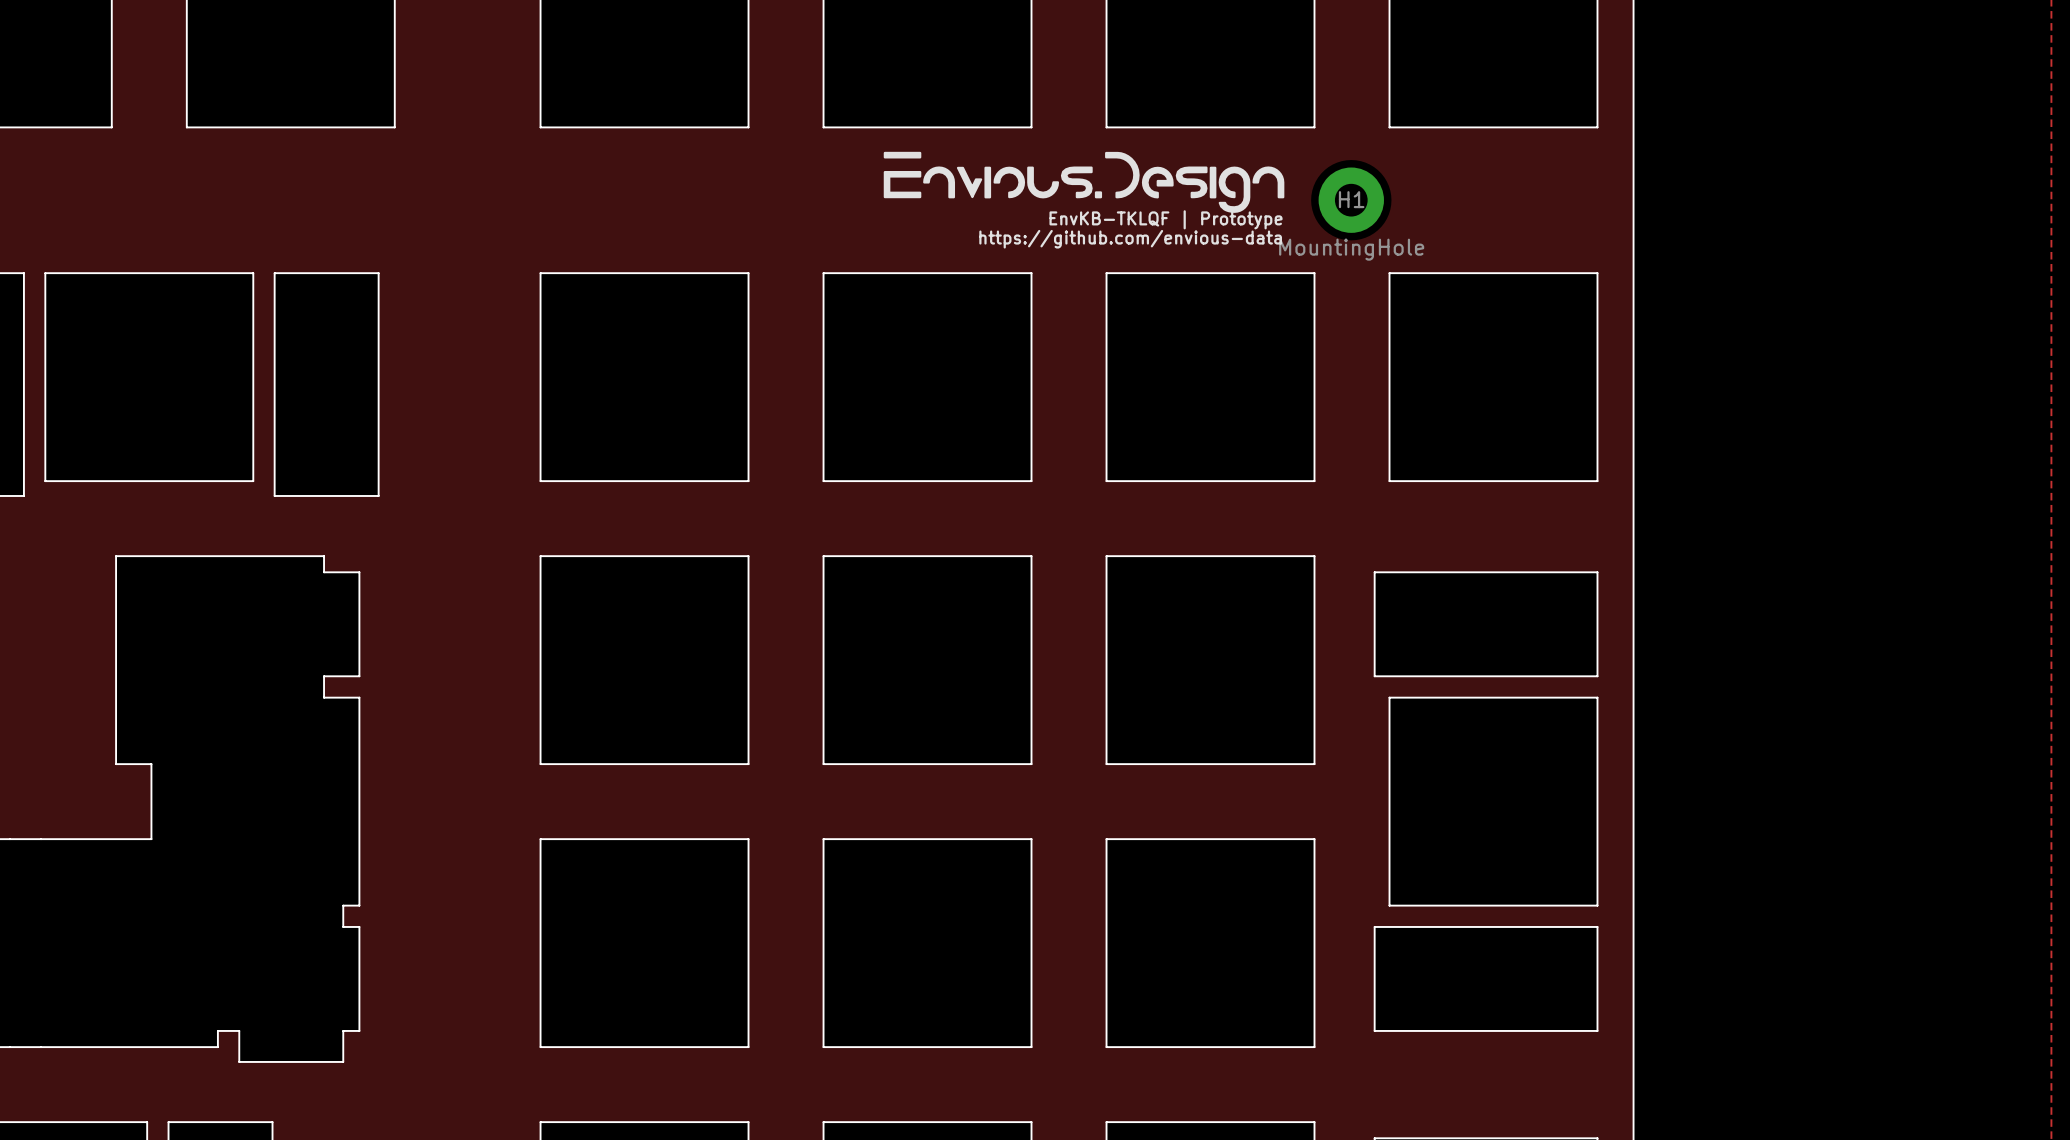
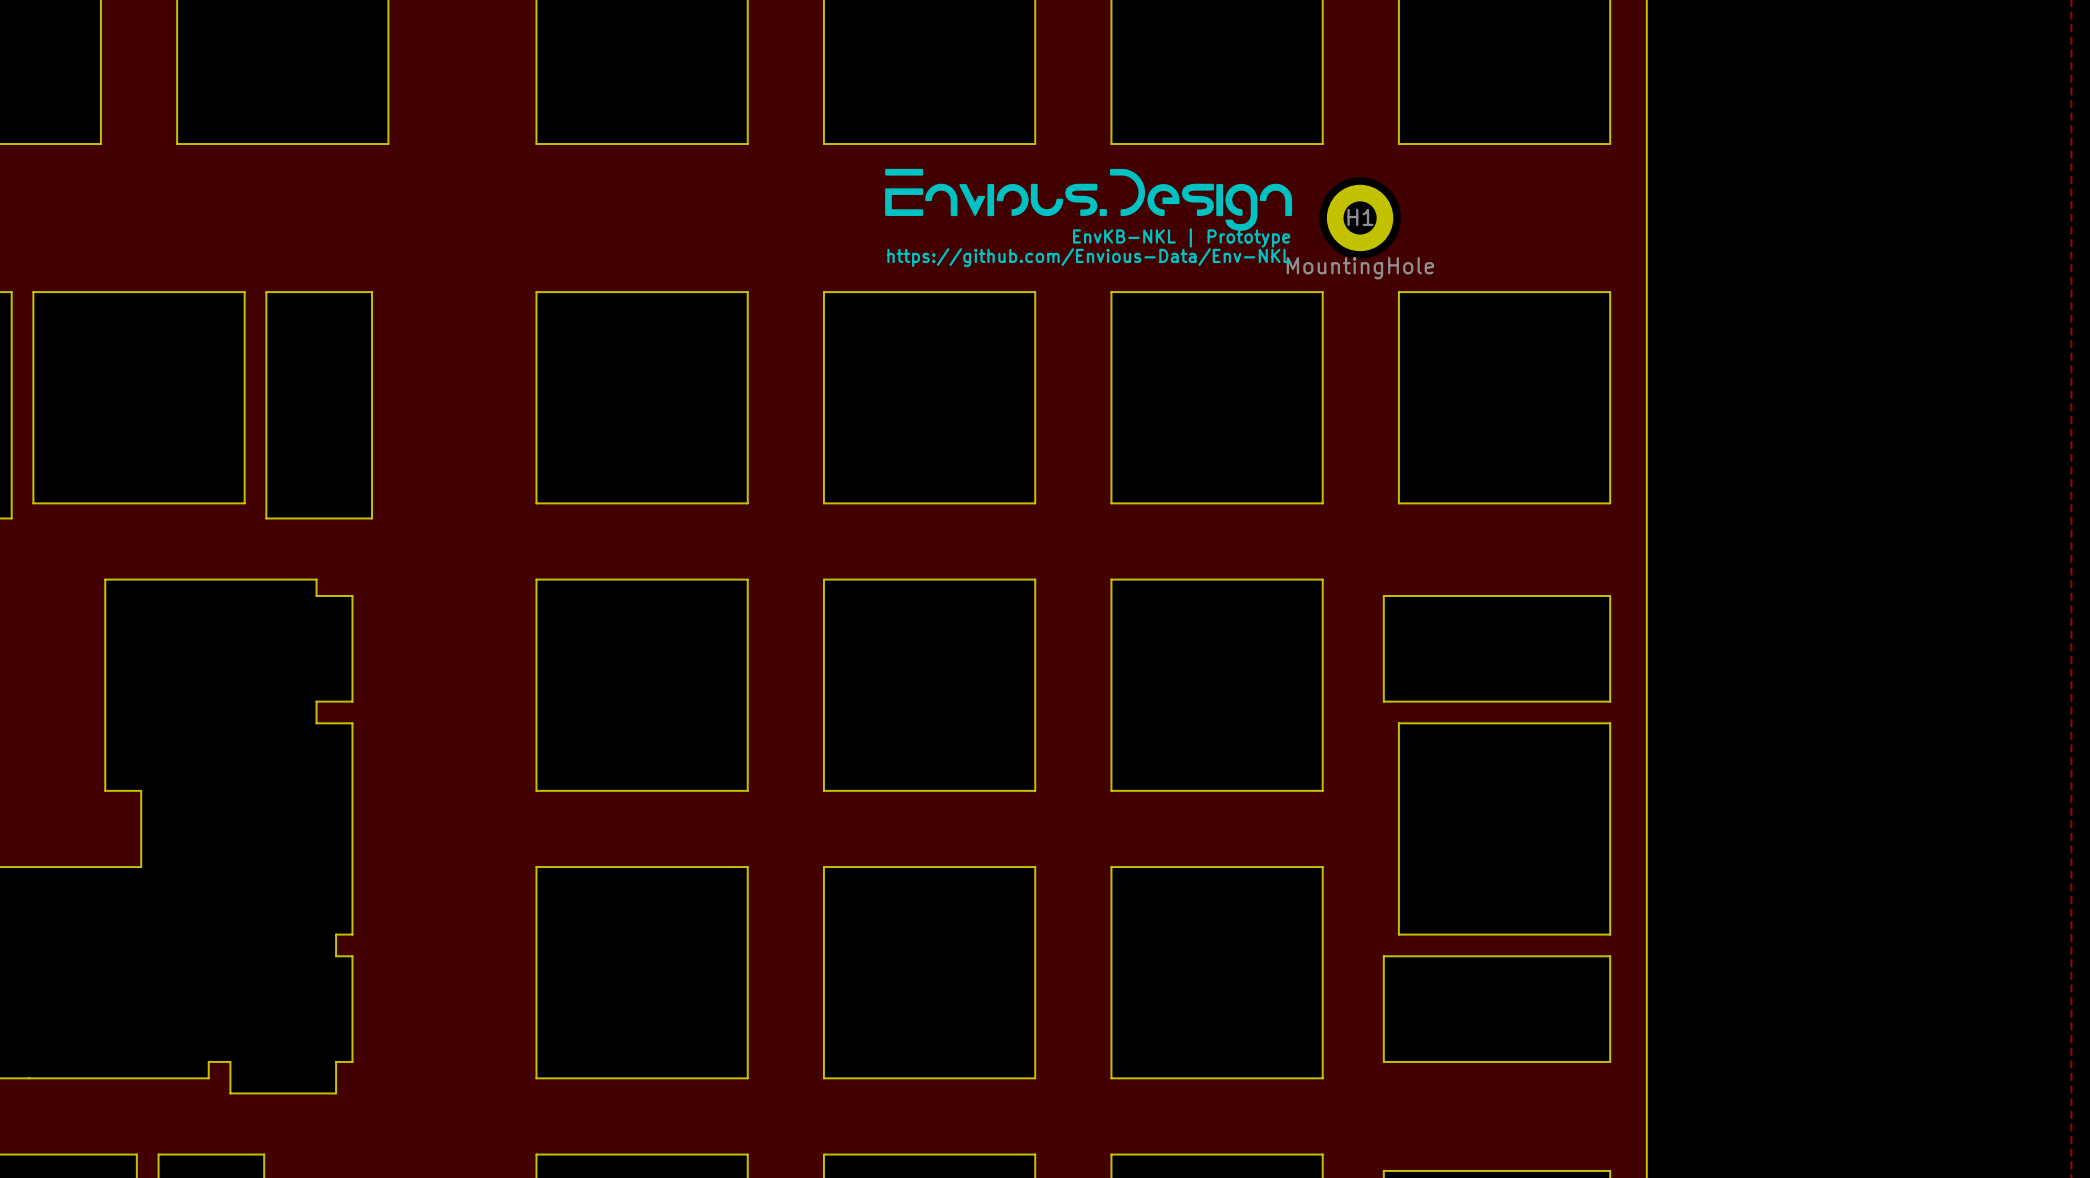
text: EnvKB-TKLQF | Prototype (1166, 219) -> EnvKB-NKL | Prototype (1181, 237)
text: https://github.com/envious-data (1130, 239) -> https://github.com/Envious-Data/Env-NKL (1089, 257)

